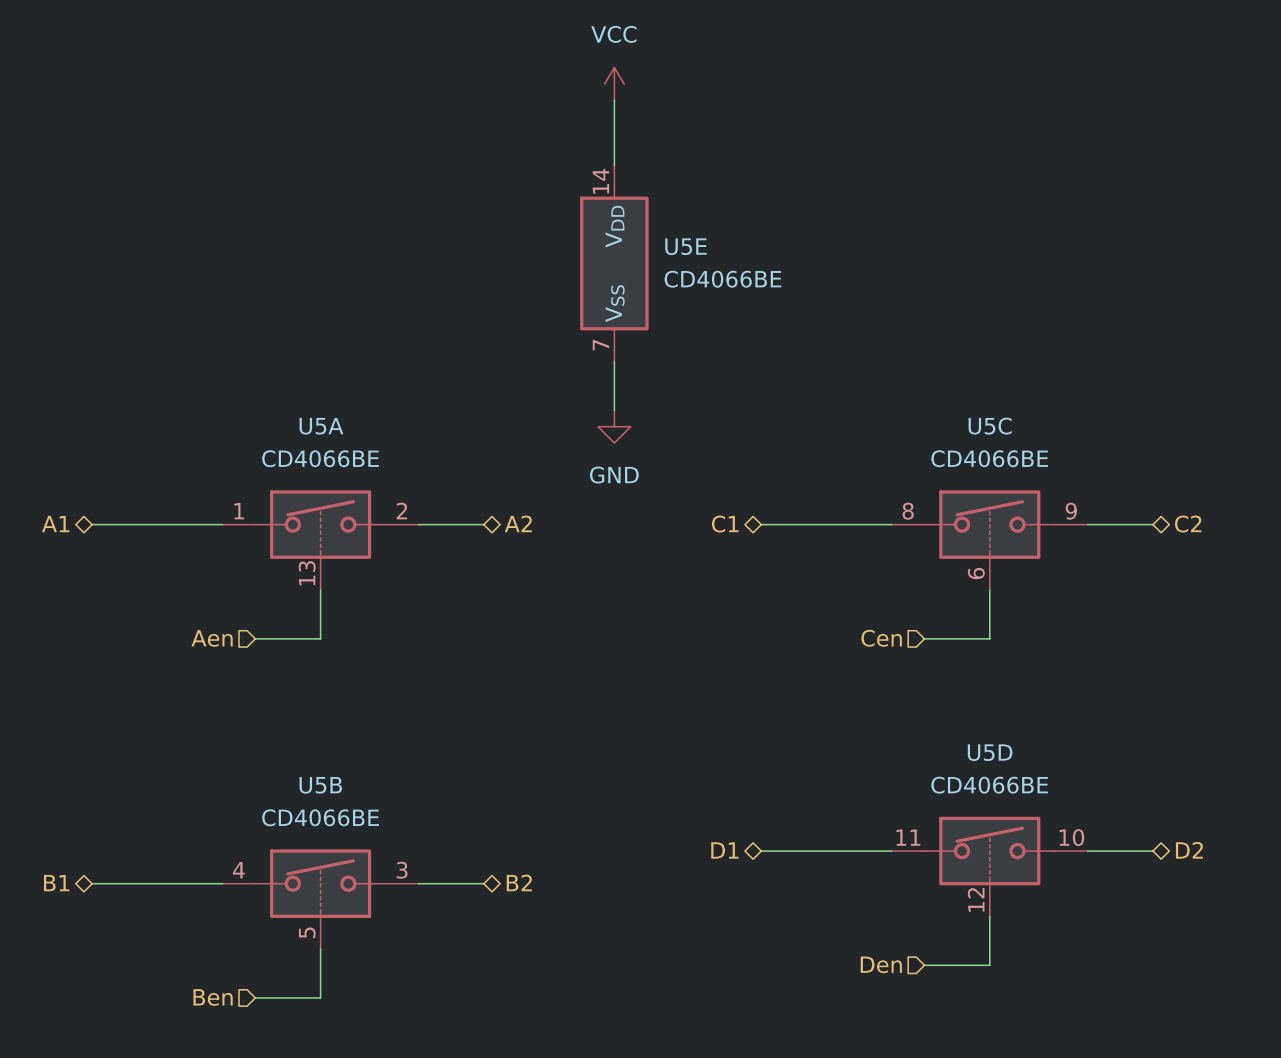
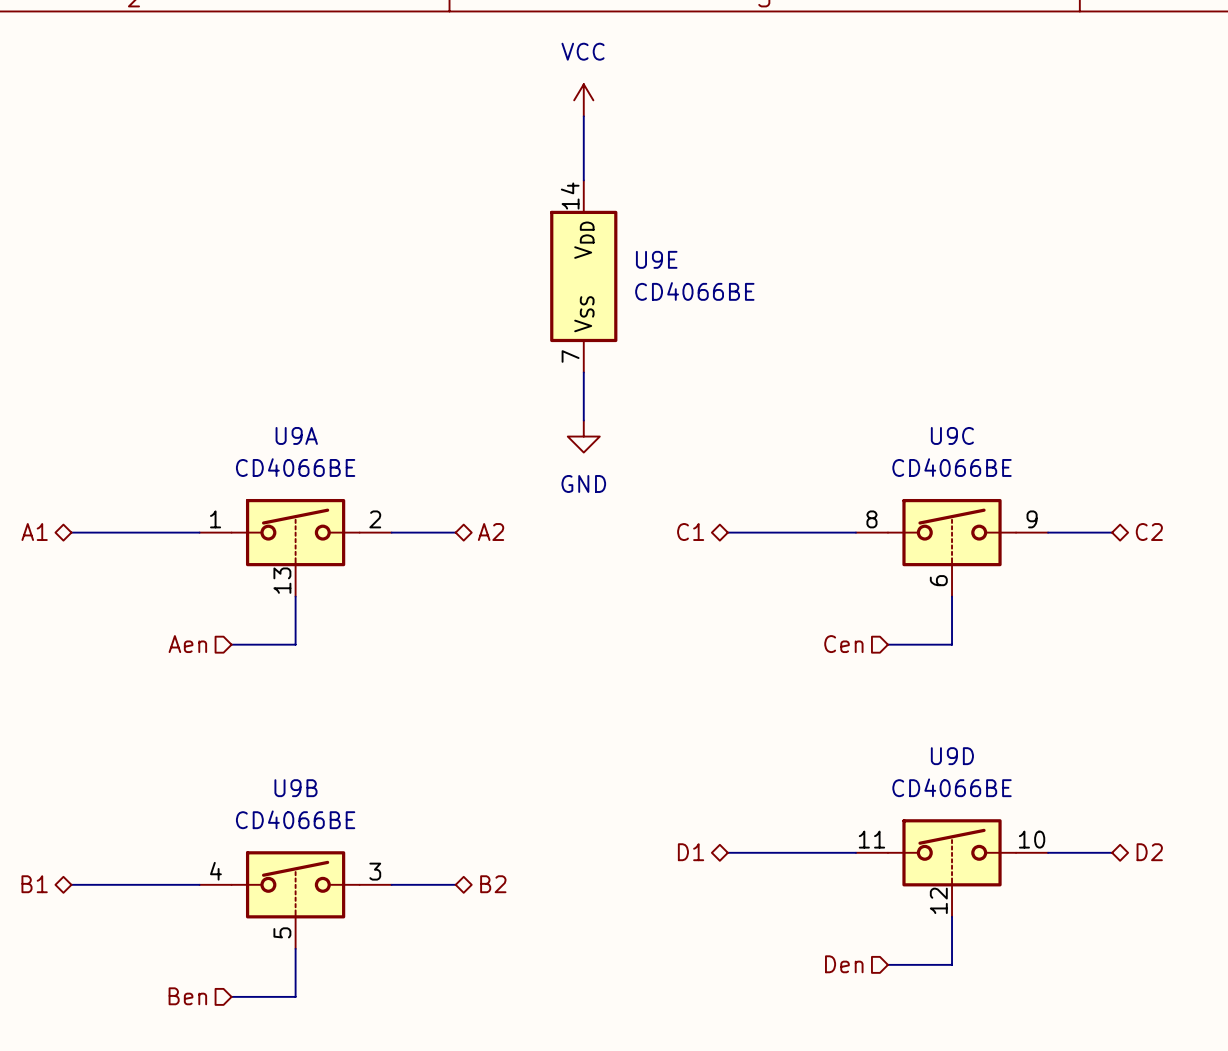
U5E name: U5E (685, 246) -> U9E (656, 259)
U5A name: U5A (321, 426) -> U9A (296, 435)
U5C name: U5C (990, 426) -> U9C (952, 435)
U5D name: U5D (990, 752) -> U9D (952, 756)
U5B name: U5B (320, 785) -> U9B (295, 788)

